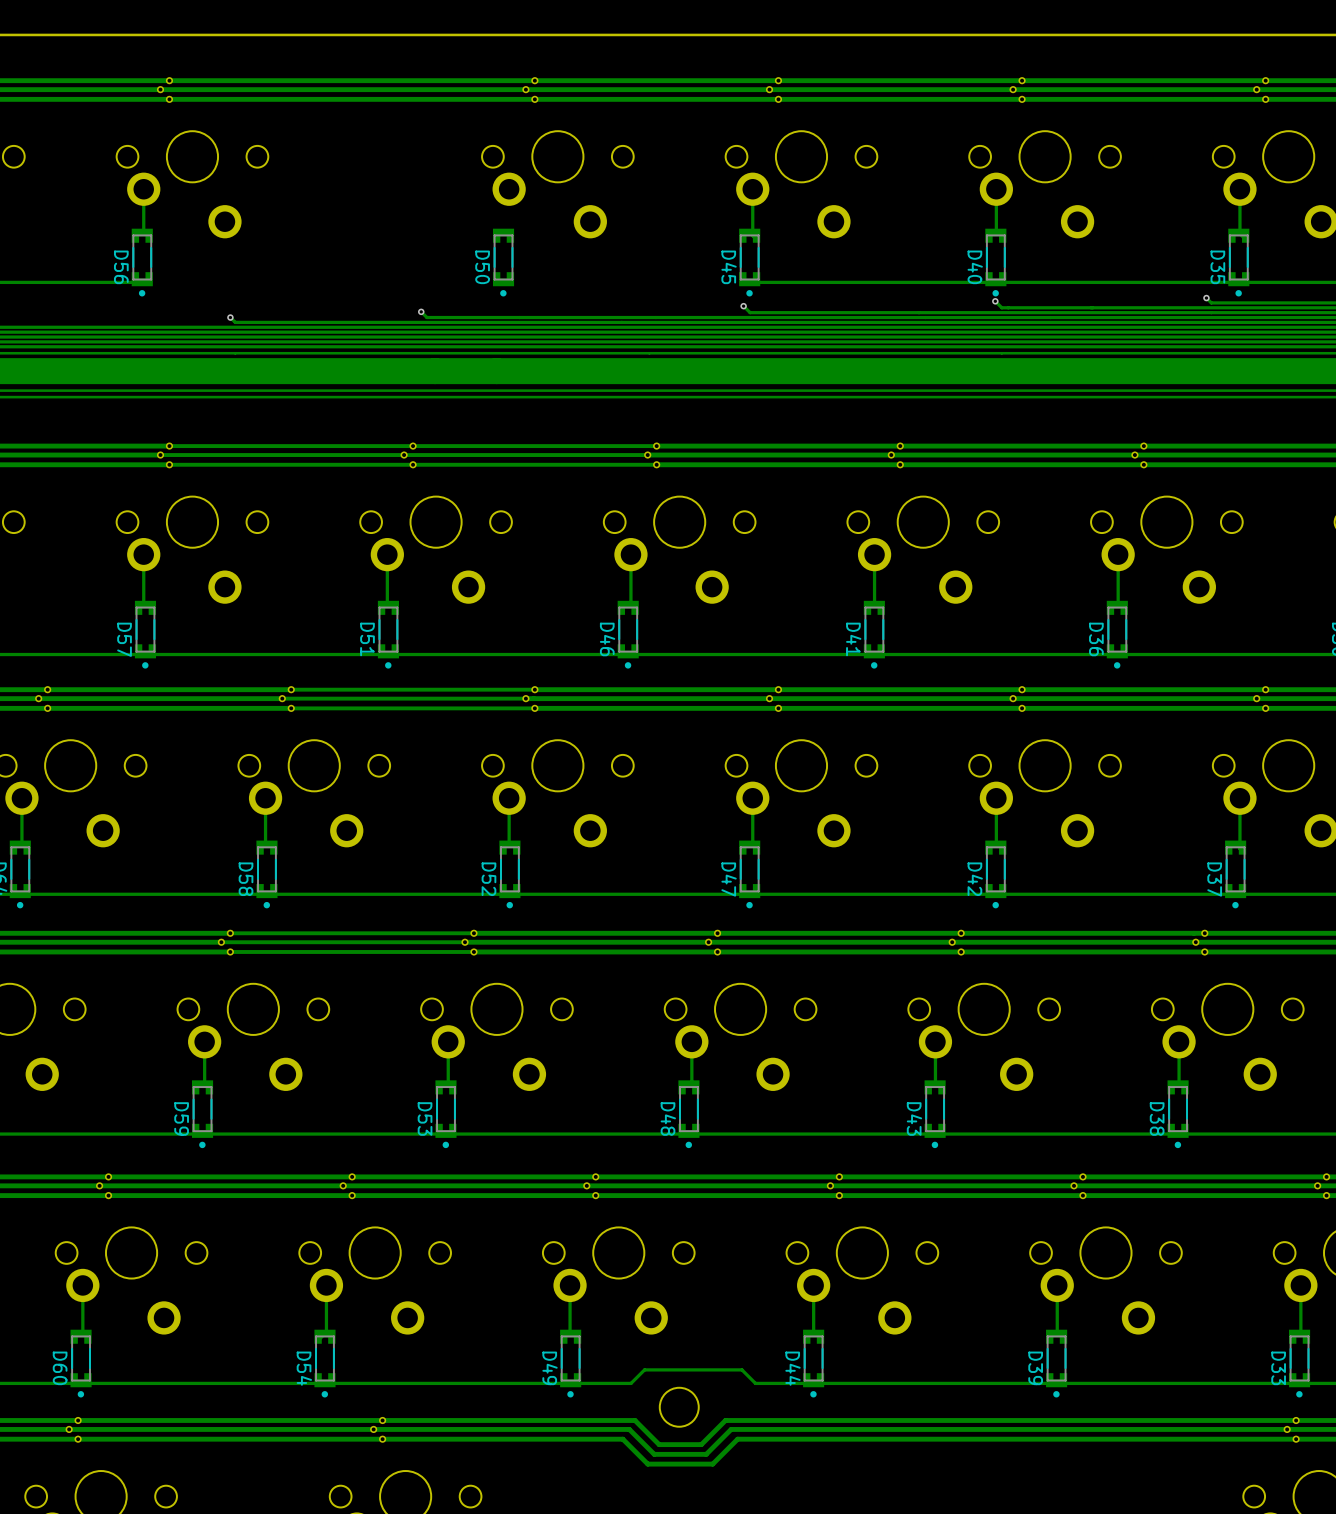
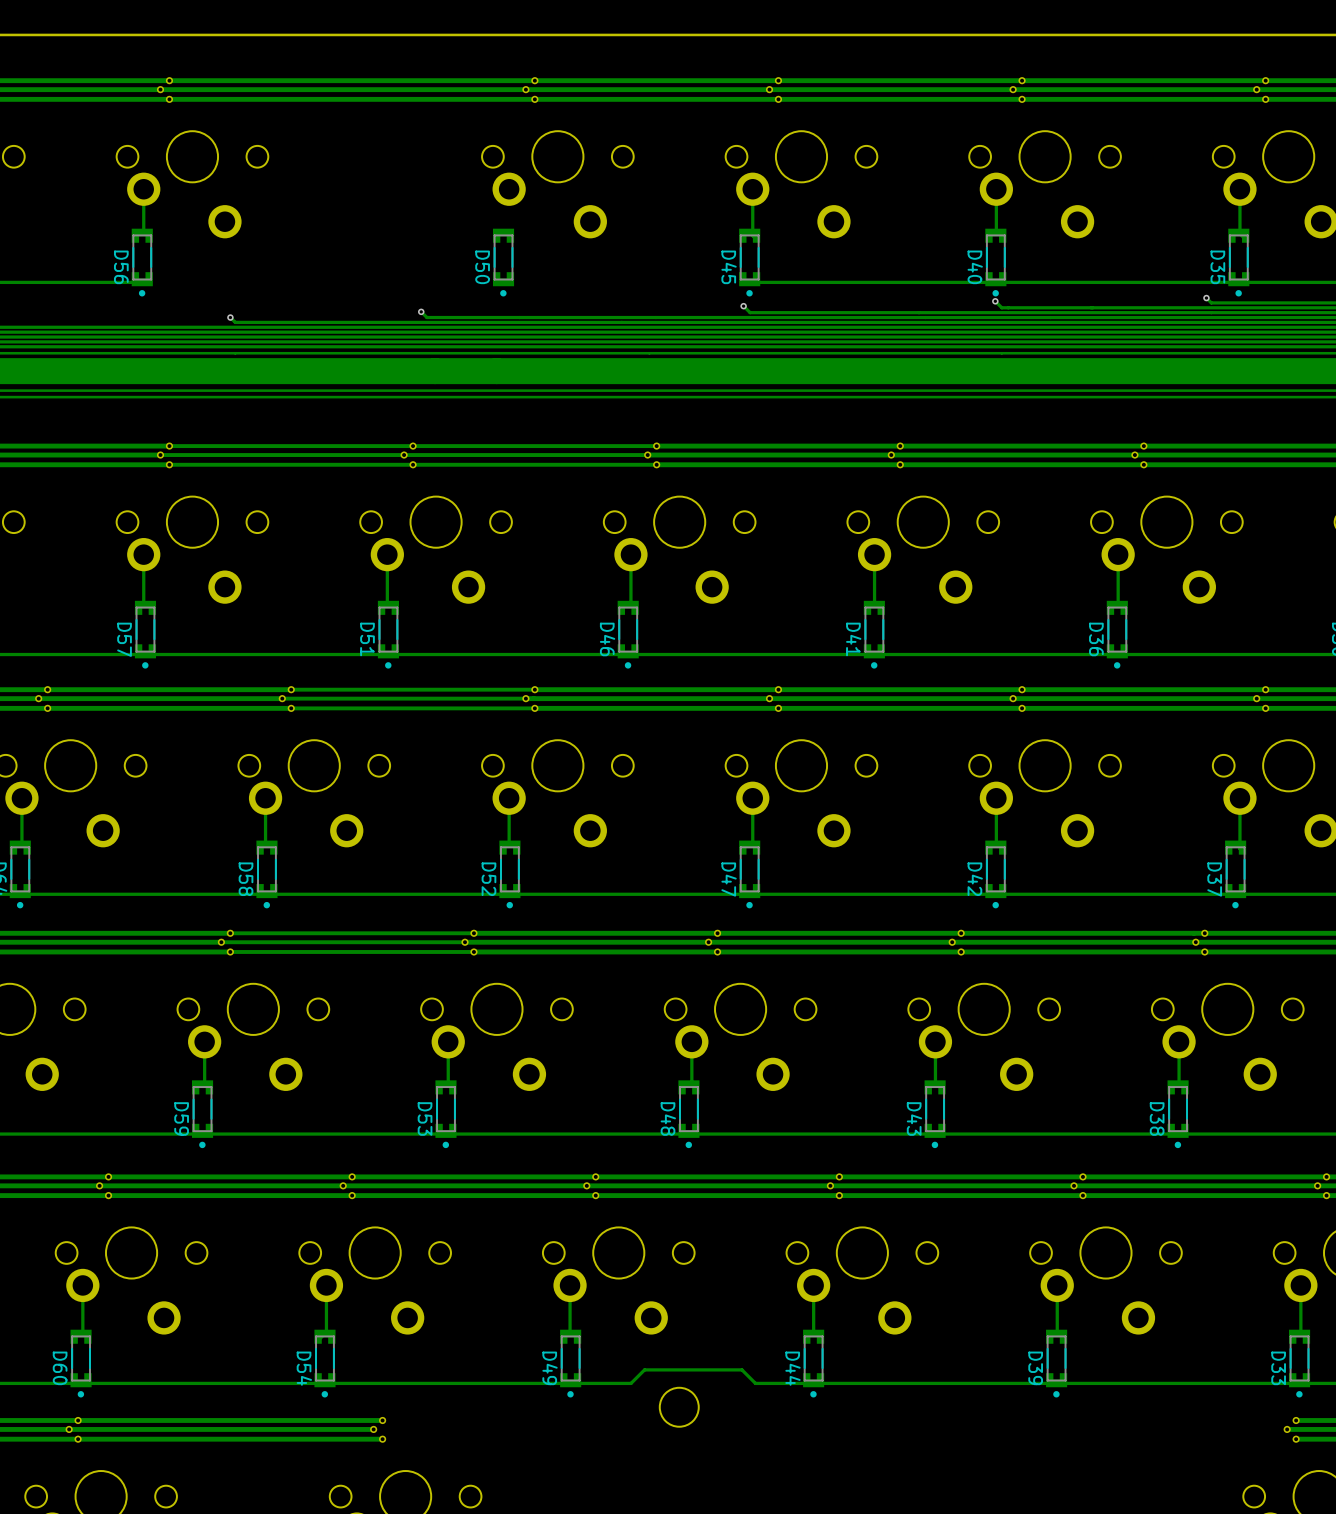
track: (1296, 1420) (725, 1420) (701, 1444) (659, 1444) (635, 1420) (382, 1420) -> none
track: (1287, 1429) (731, 1429) (706, 1454) (654, 1454) (629, 1429) (373, 1429) -> none
track: (1295, 1438) (1296, 1439) (737, 1439) (712, 1464) (647, 1464) (622, 1439) (382, 1439) -> none

